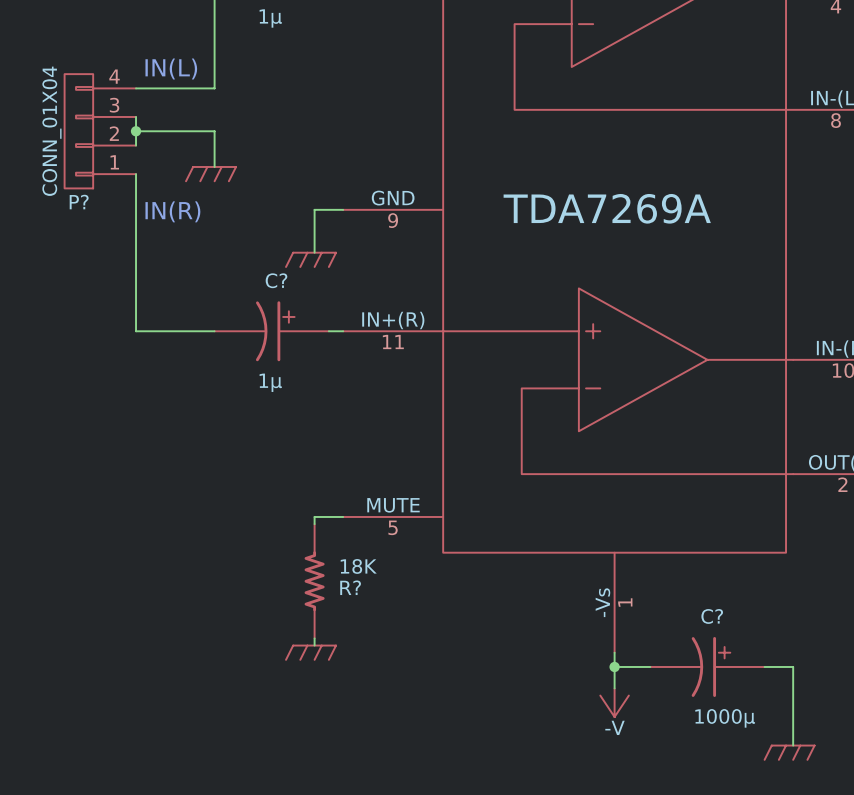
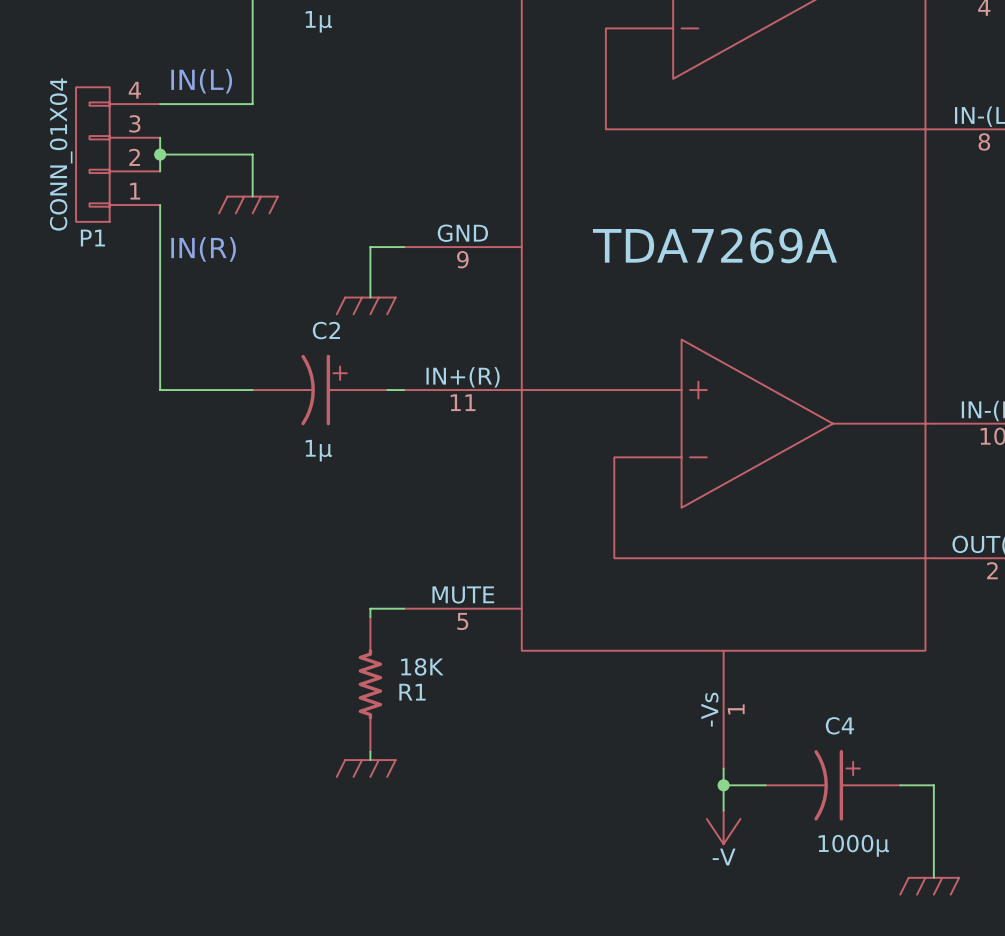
P? name: P? (79, 202) -> P1 (92, 238)
C? name: C? (276, 280) -> C2 (326, 330)
R? name: R? (350, 587) -> R1 (412, 692)
C? name: C? (712, 616) -> C4 (839, 725)

